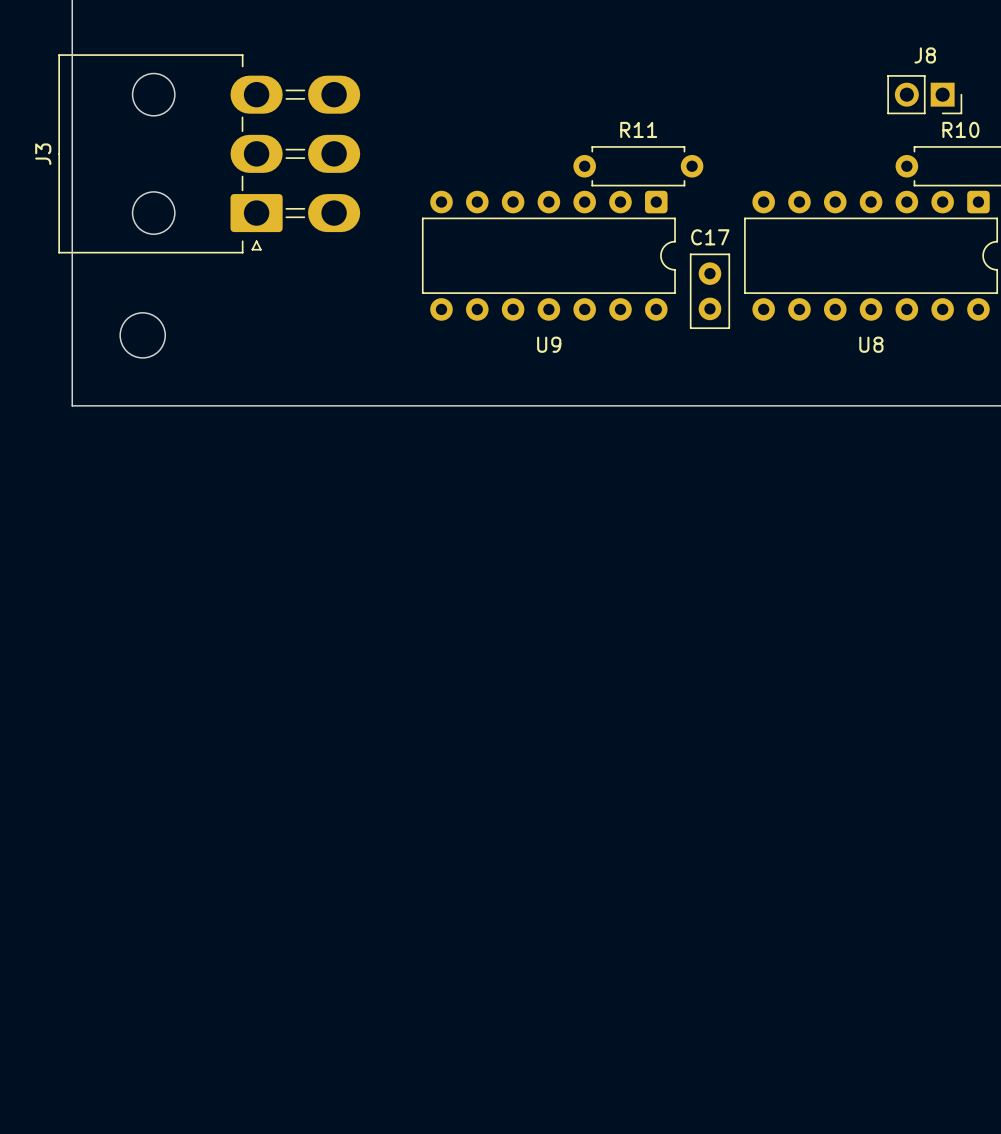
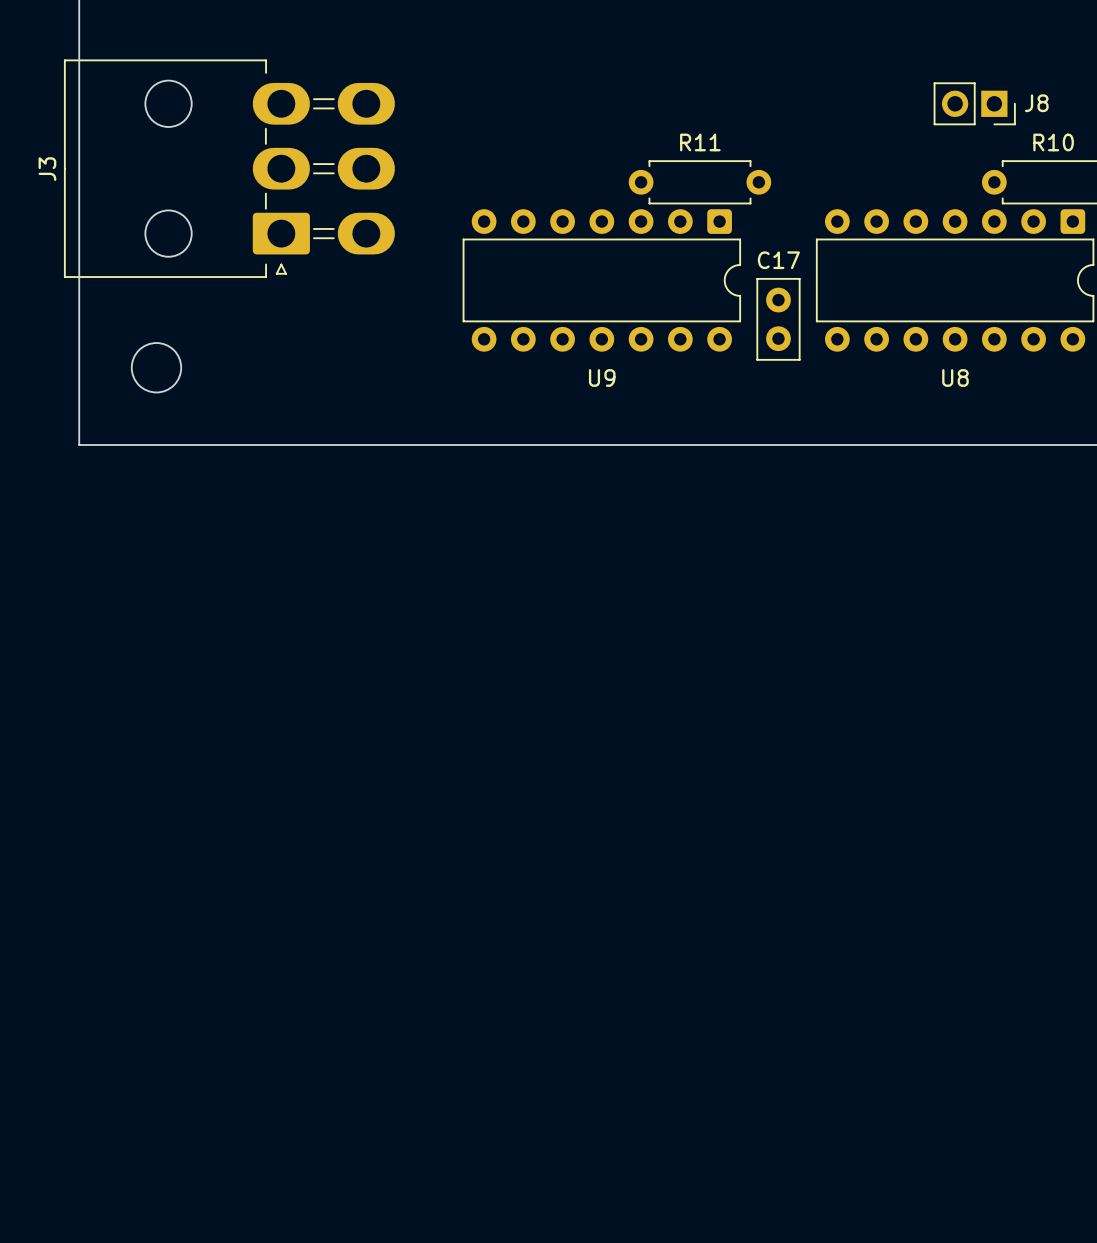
J8 name position: J8 (925, 55) -> J8 (1036, 103)
J8 position: (924, 94) -> (974, 103)

